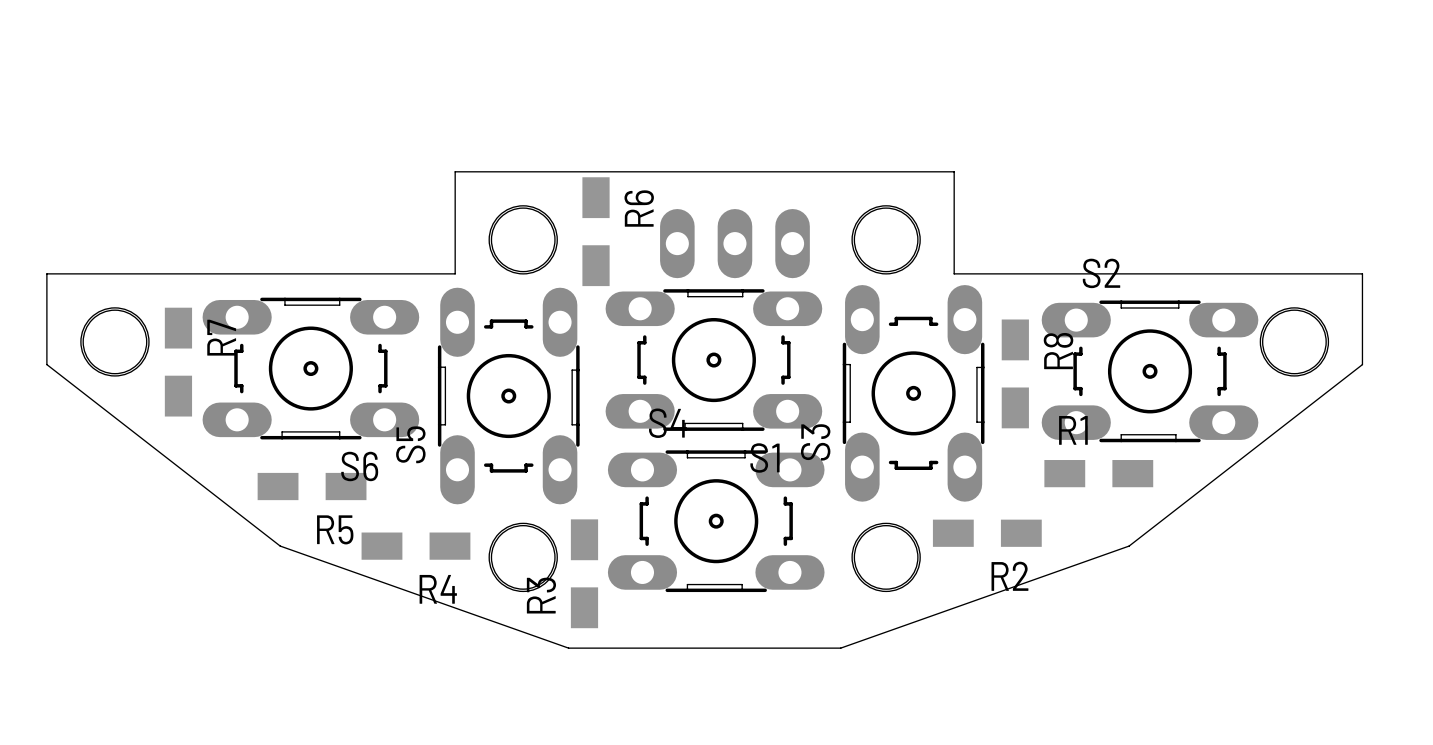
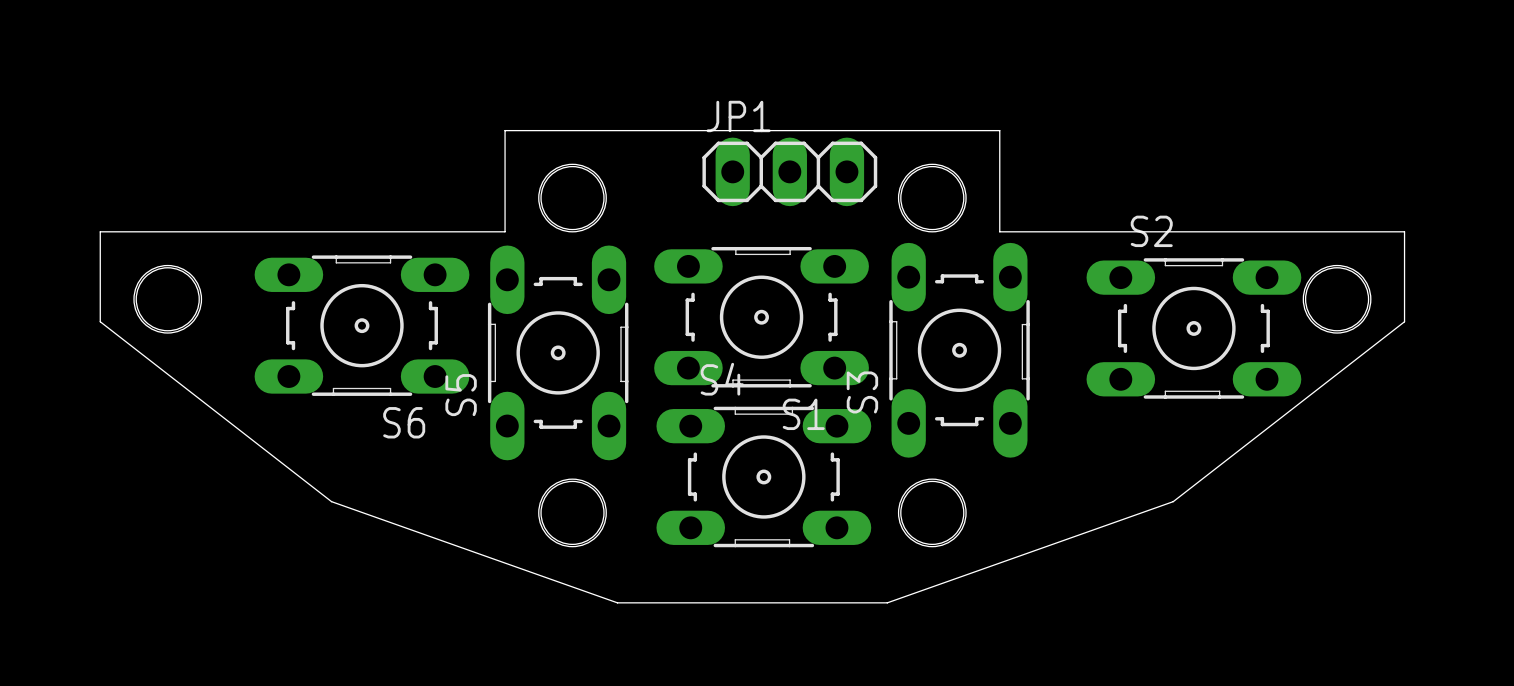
R6: (596, 231) -> none
JP1 side: bottom (734, 243) -> top (789, 171)
R7: (178, 362) -> none
R8: (1015, 373) -> none
R1: (1098, 473) -> none
R5: (312, 486) -> none
R2: (987, 533) -> none
R4: (415, 546) -> none
R3: (584, 573) -> none

